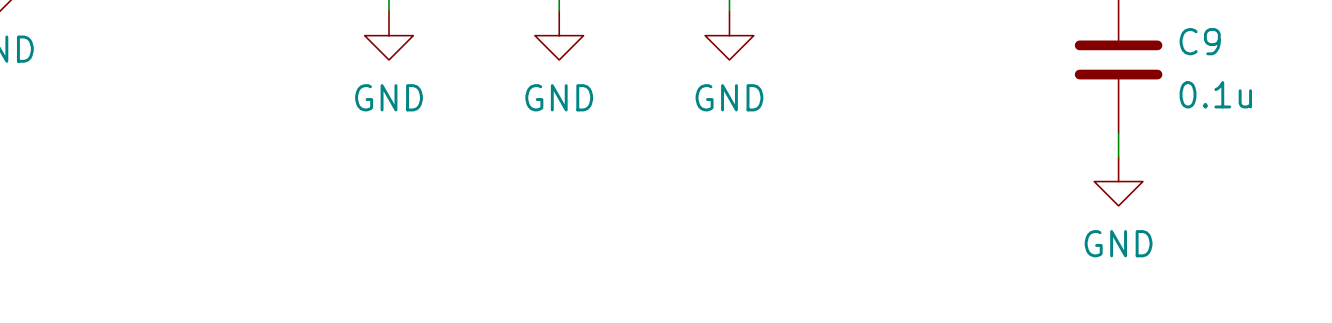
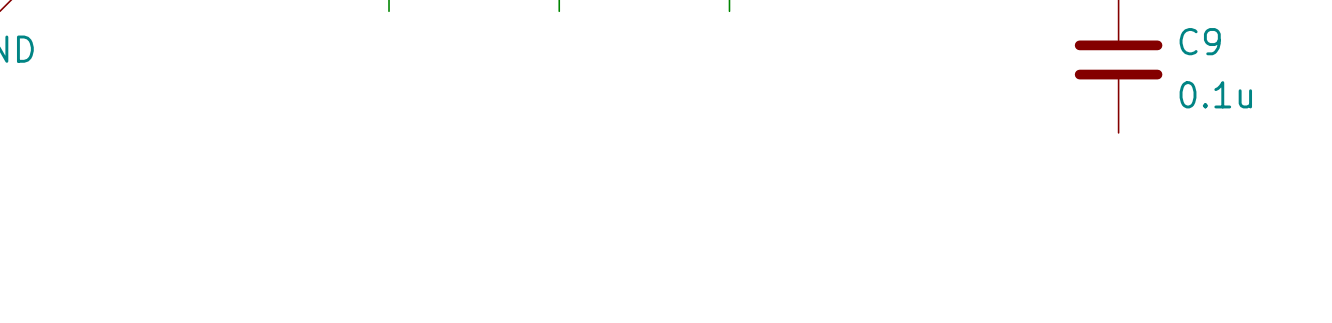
power symbol: GND (389, 35) -> none
power symbol: GND (559, 35) -> none
power symbol: GND (729, 35) -> none
wire: (1118, 132) (1118, 157) -> none
power symbol: GND (1118, 181) -> none

